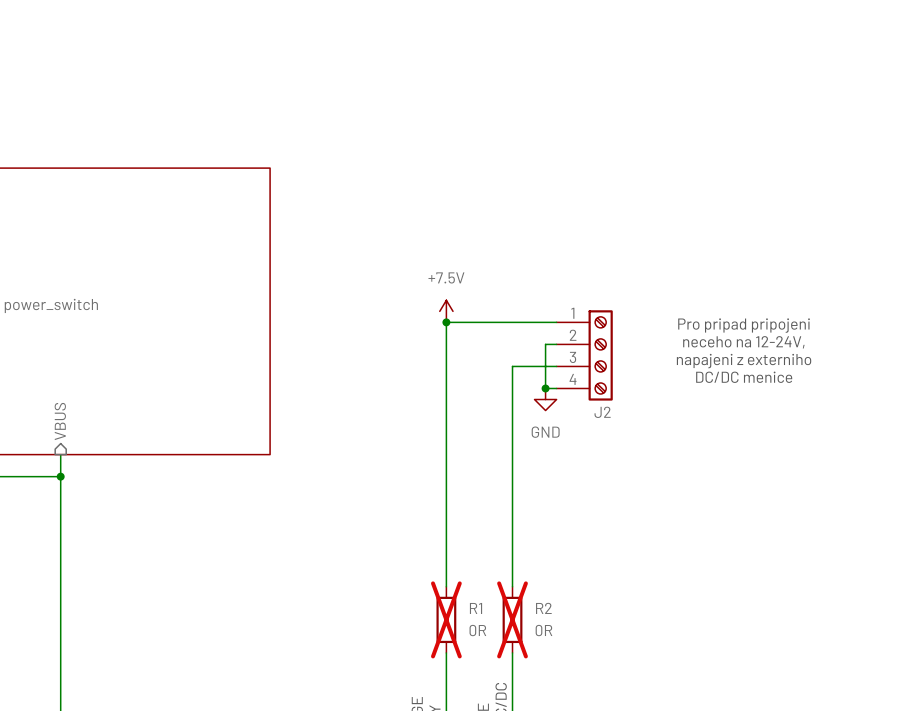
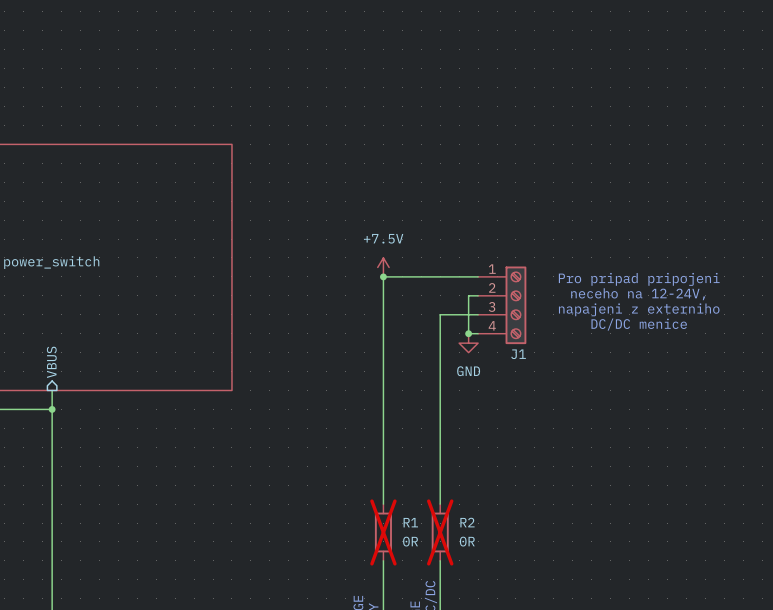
J2 name: J2 (602, 412) -> J1 (518, 354)

